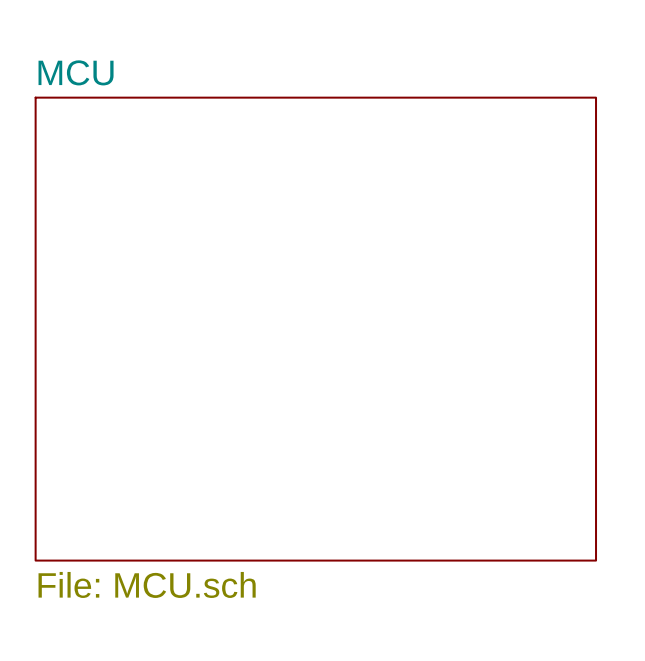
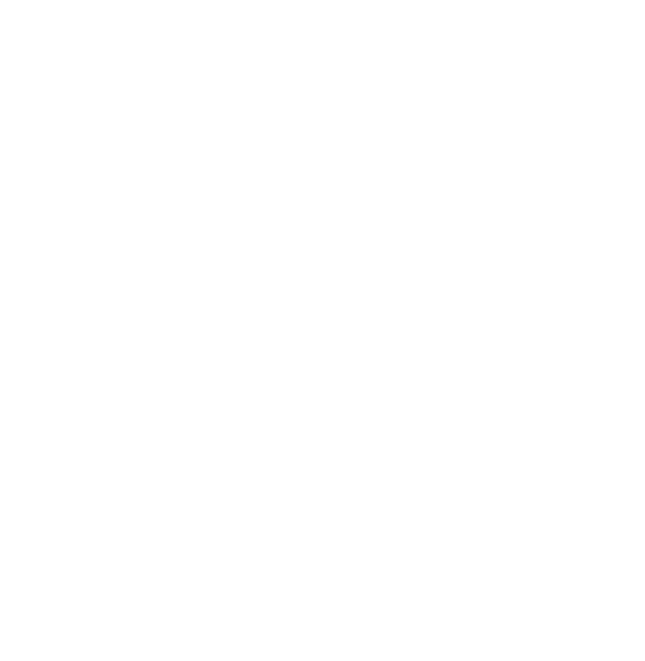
sheet MCU: File: MCU.sch (315, 329) -> none

